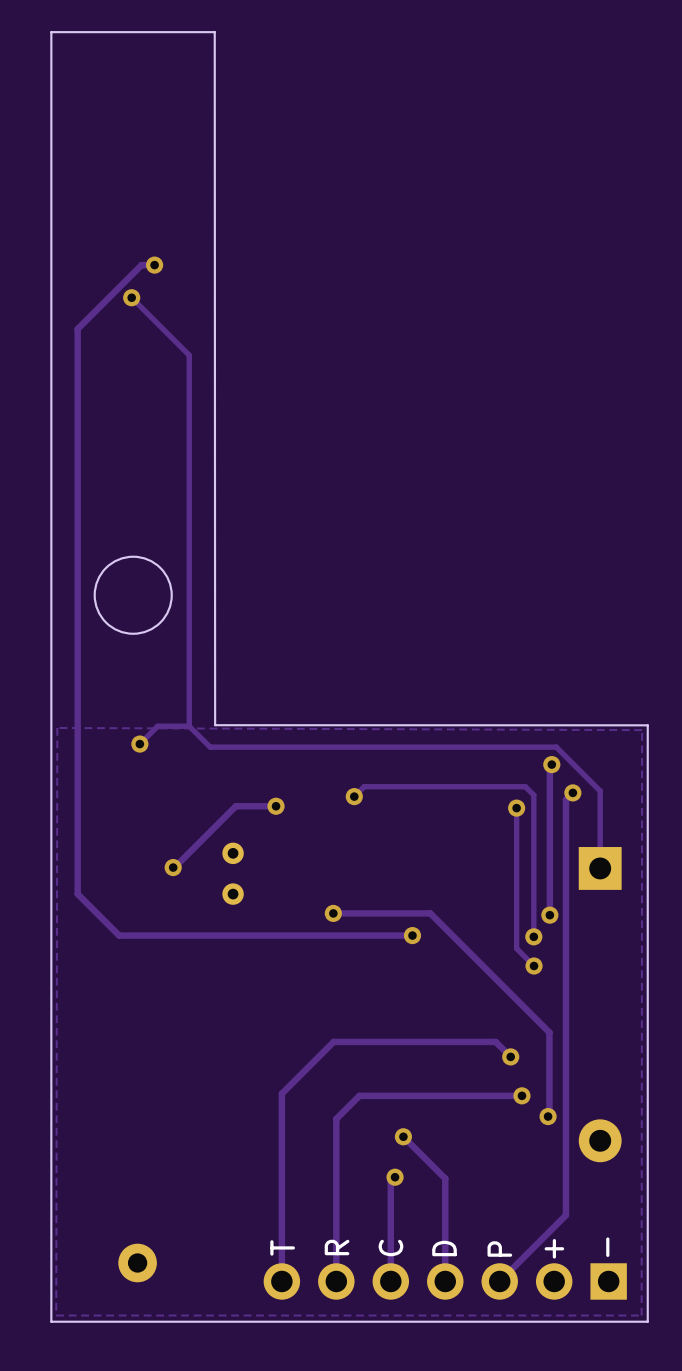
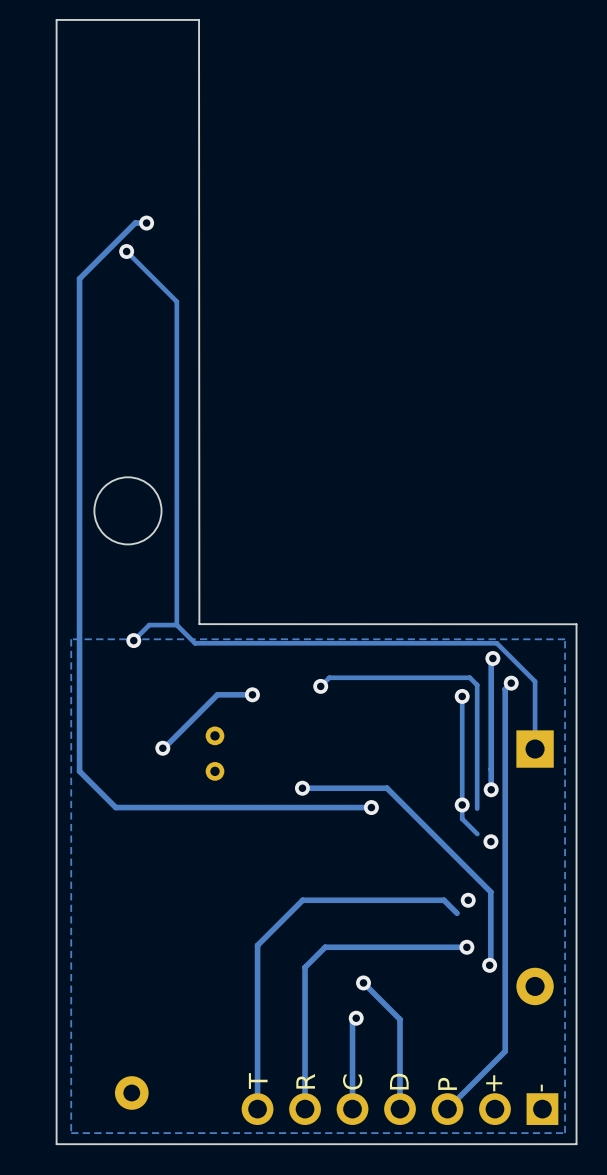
zone outline: (57, 727) (642, 730) (641, 1315) (56, 1315) (57, 727) -> (565, 639) (565, 1133) (71, 1133) (71, 639) (565, 639)
via position: (533, 936) -> (462, 804)
via position: (534, 966) -> (490, 841)
via position: (510, 1056) -> (468, 900)

